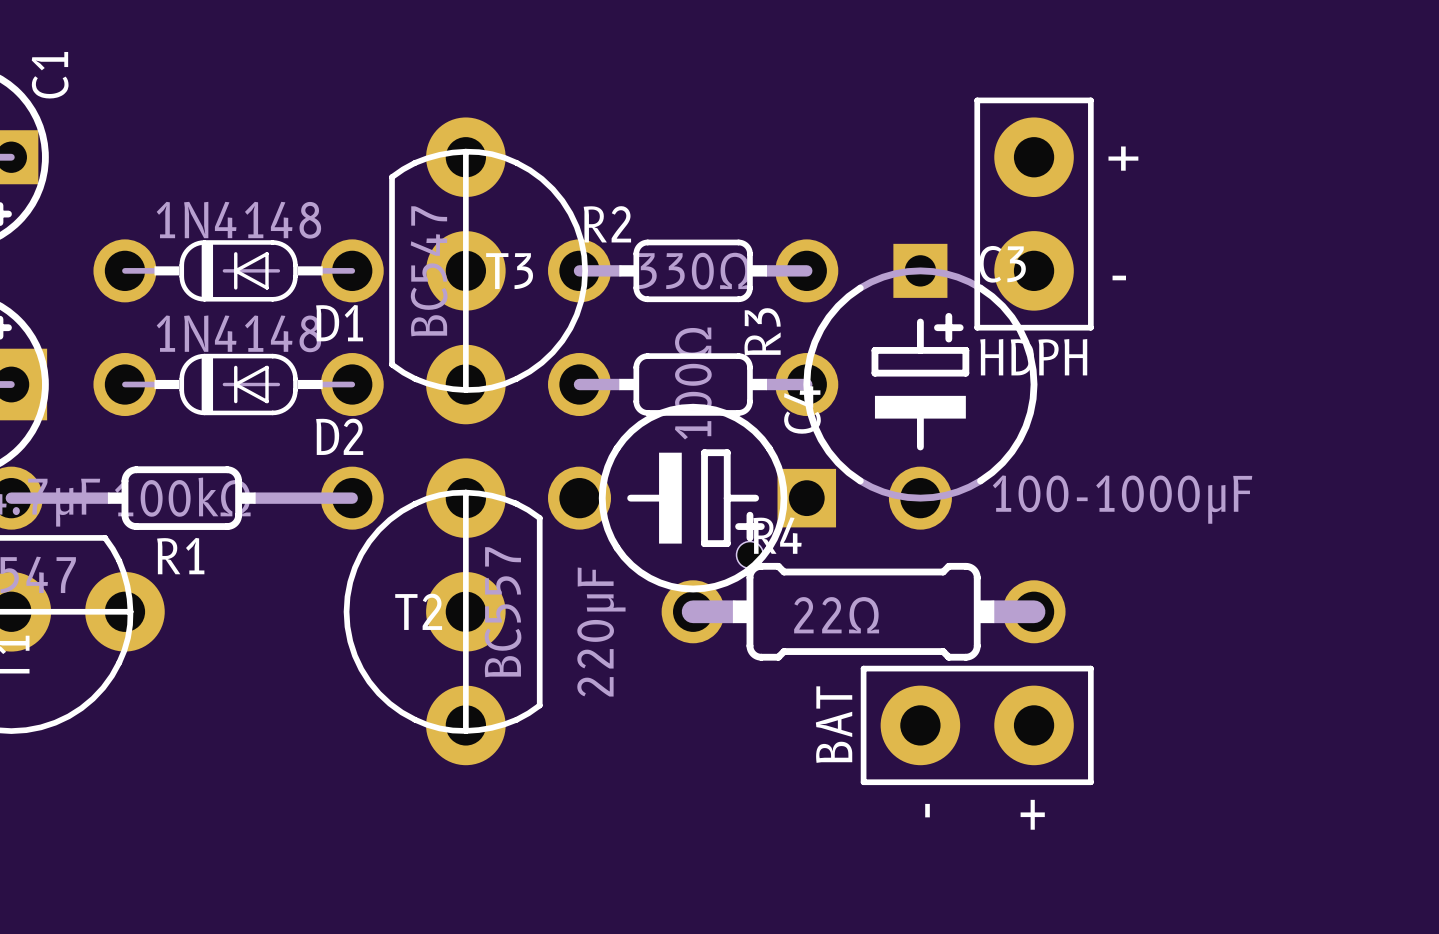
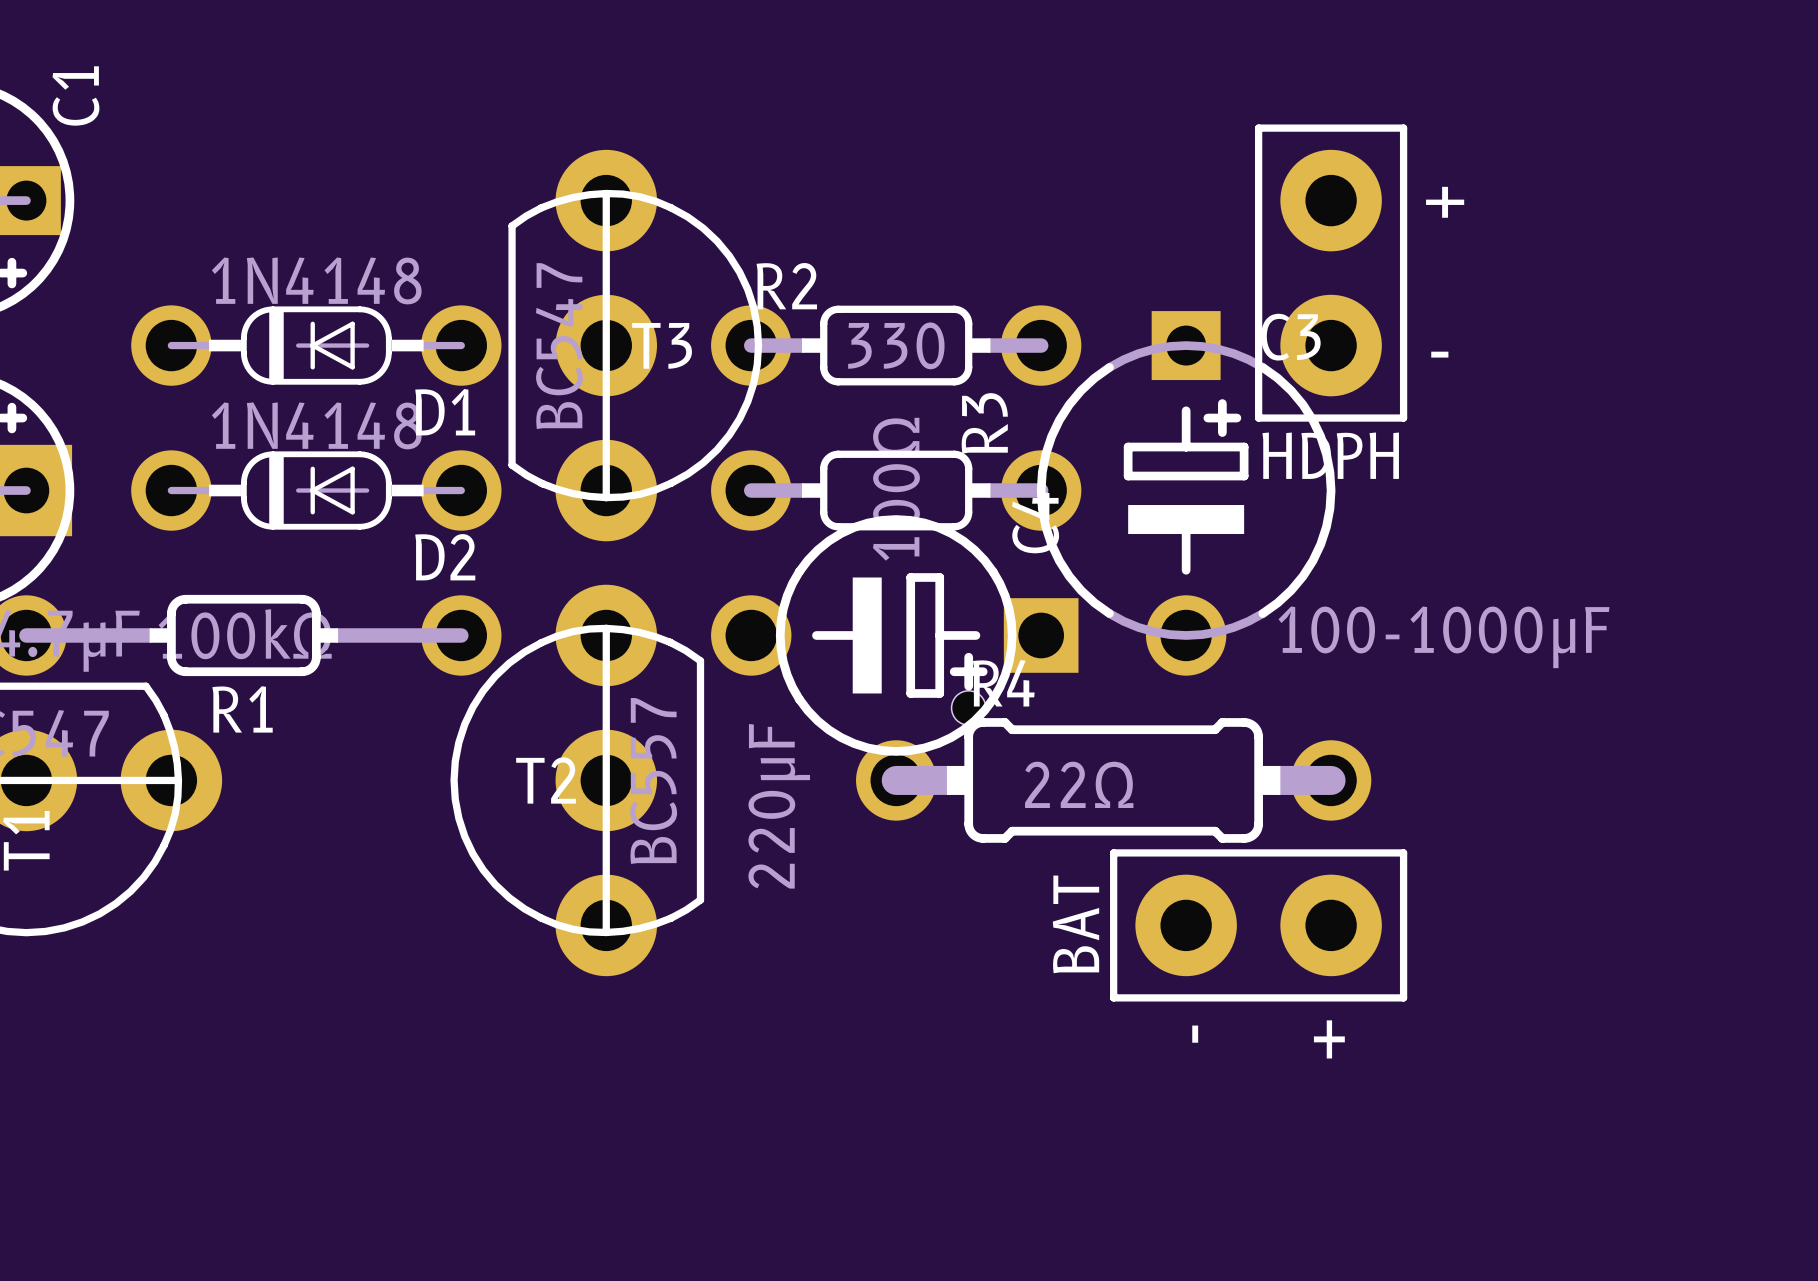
R2 value: 330Ω (694, 271) -> 330 (896, 345)

